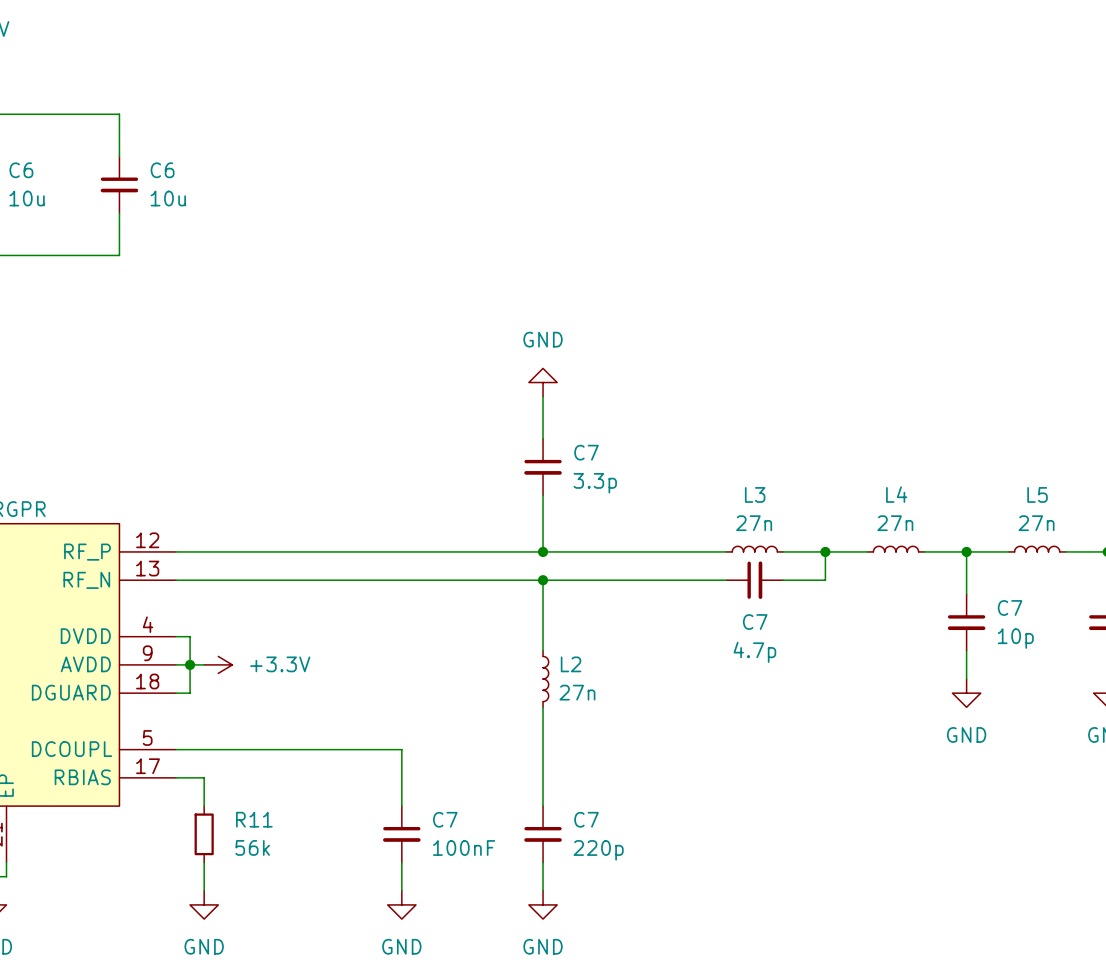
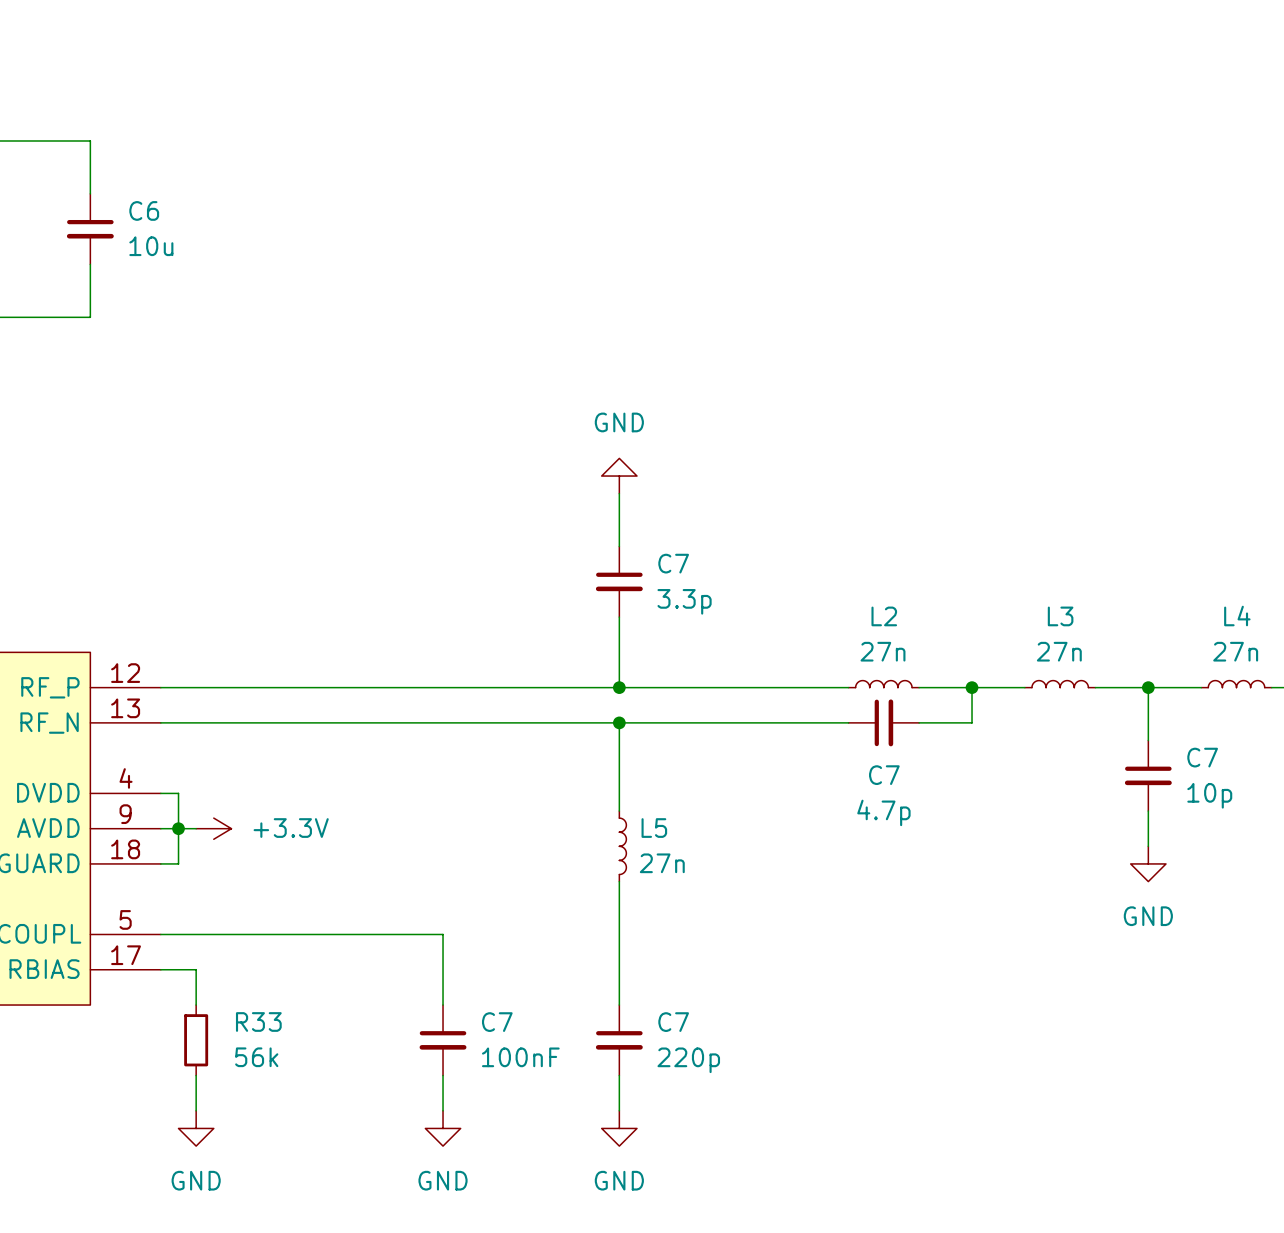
L3 name: L3 (755, 494) -> L2 (884, 616)
L4 name: L4 (896, 494) -> L3 (1060, 616)
L5 name: L5 (1037, 494) -> L4 (1237, 616)
L2 name: L2 (571, 664) -> L5 (654, 828)
R11 name: R11 (254, 819) -> R33 (258, 1021)

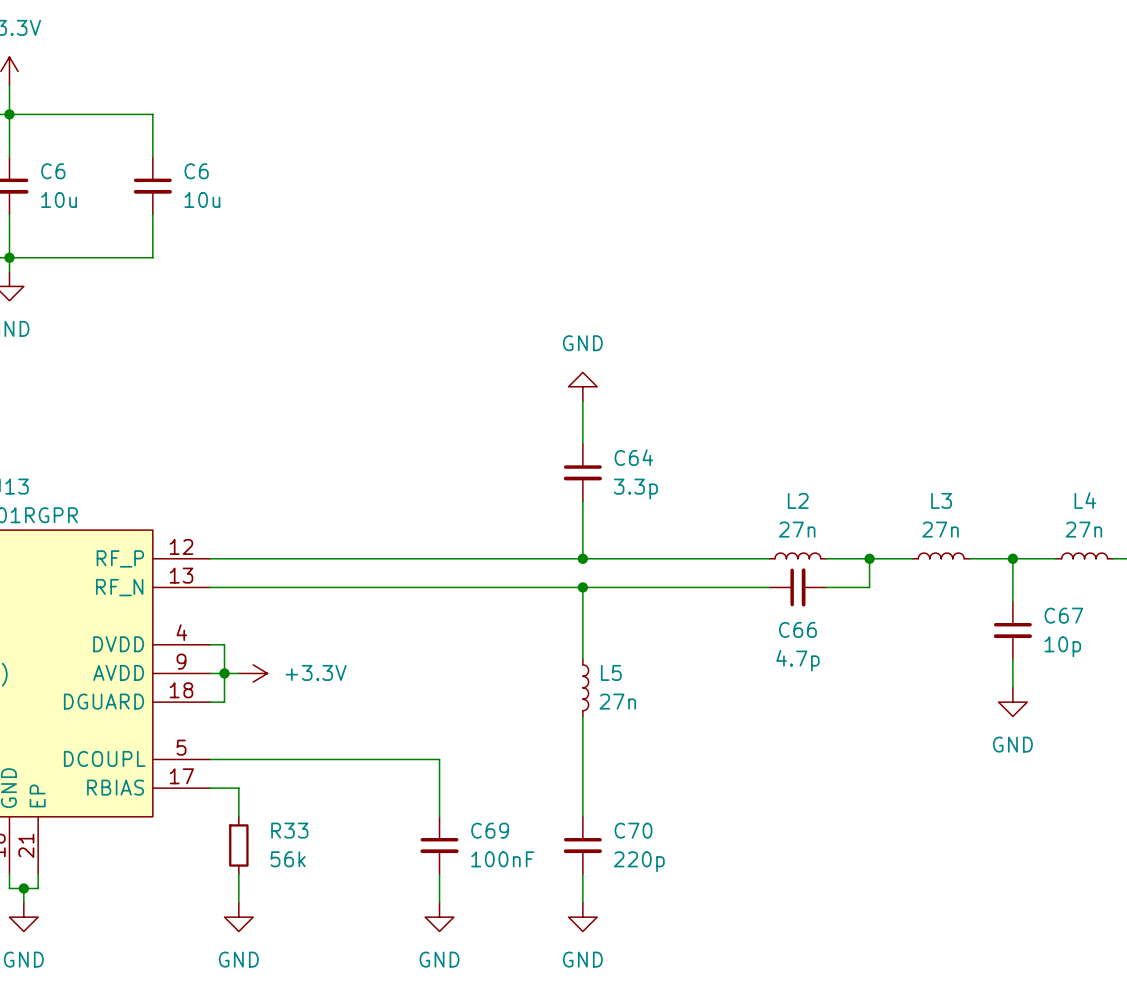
C7 name: C7 (673, 563) -> C64 (633, 457)
C7 name: C7 (1202, 757) -> C67 (1063, 615)
C7 name: C7 (884, 775) -> C66 (797, 629)
C7 name: C7 (497, 1022) -> C69 (490, 830)
C7 name: C7 (673, 1022) -> C70 (633, 830)

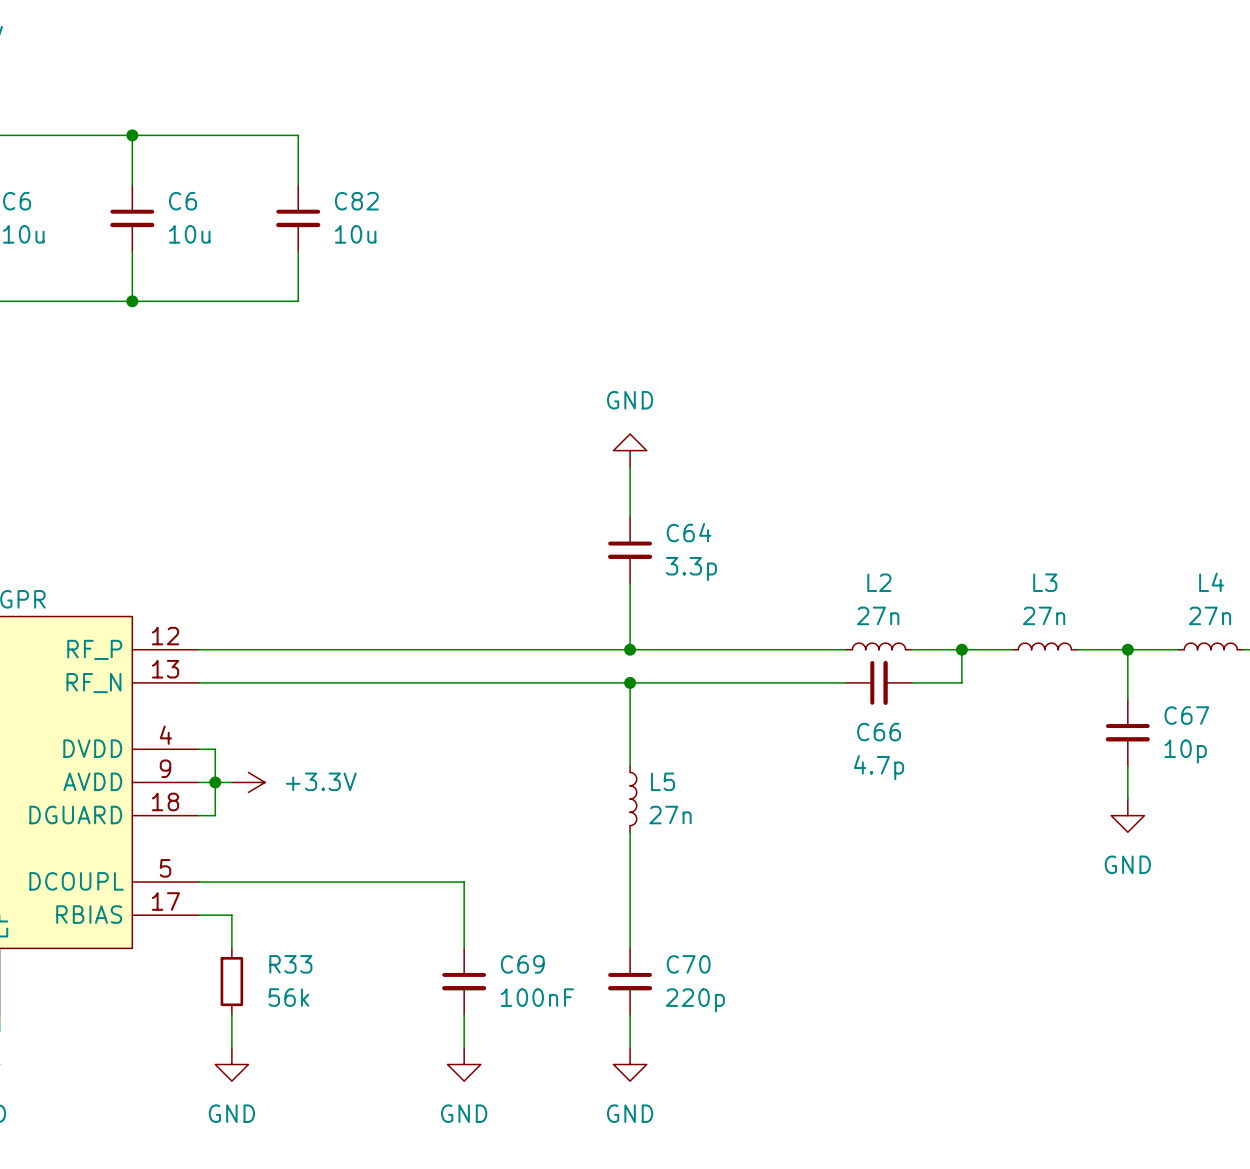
wire: none -> (132, 135) (298, 135) (298, 185)
junction: none -> (132, 135)
C82: none -> 10u (298, 218)
wire: none -> (298, 251) (298, 301) (132, 301)
junction: none -> (132, 301)

